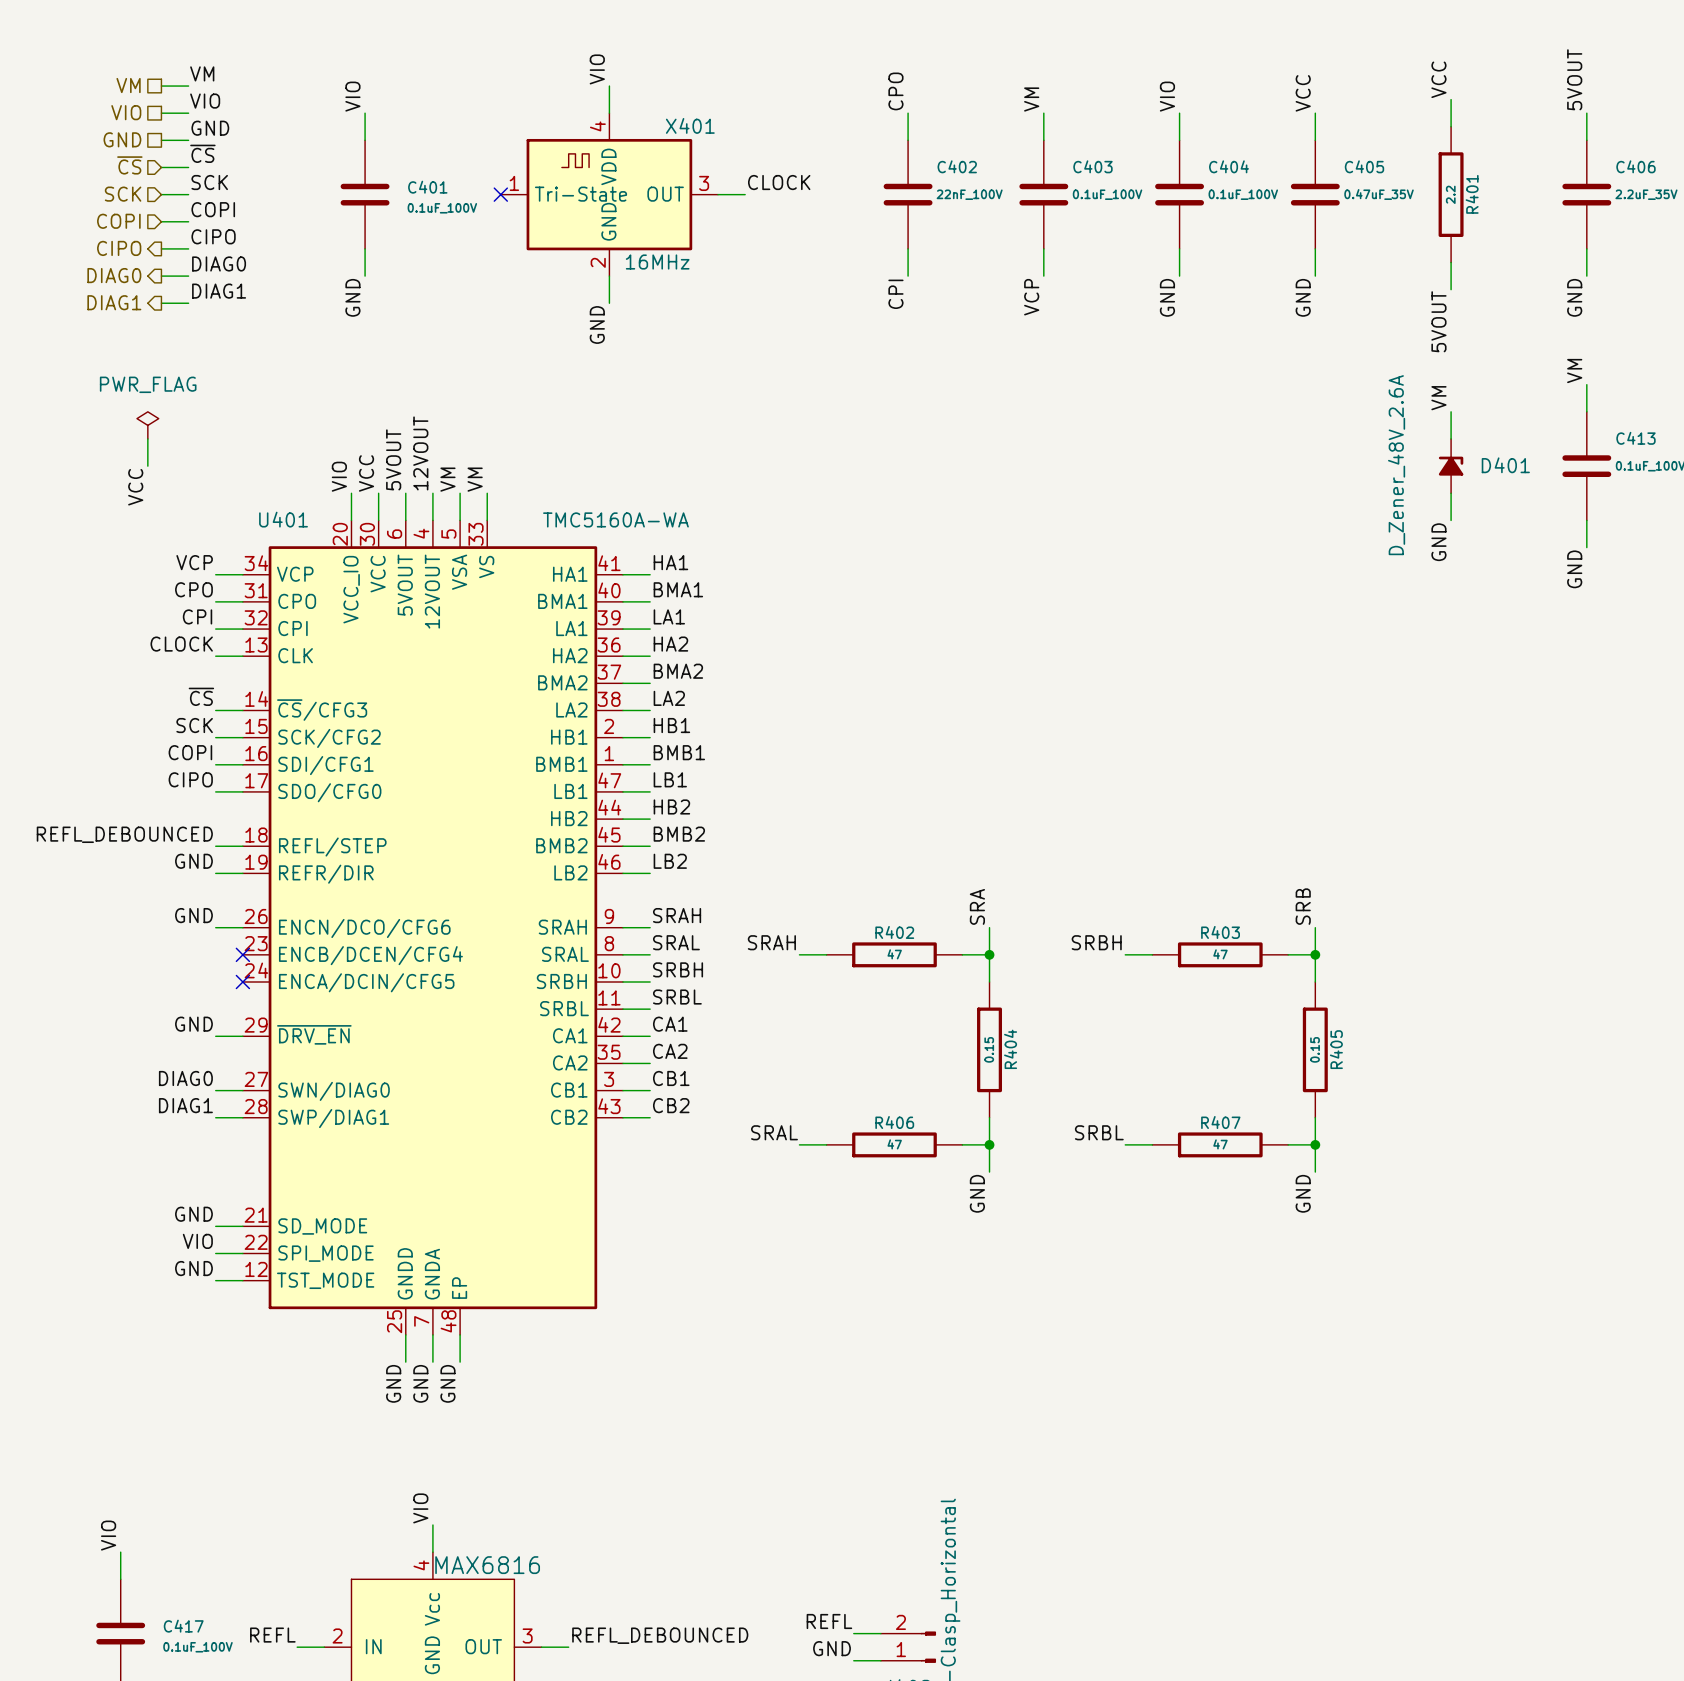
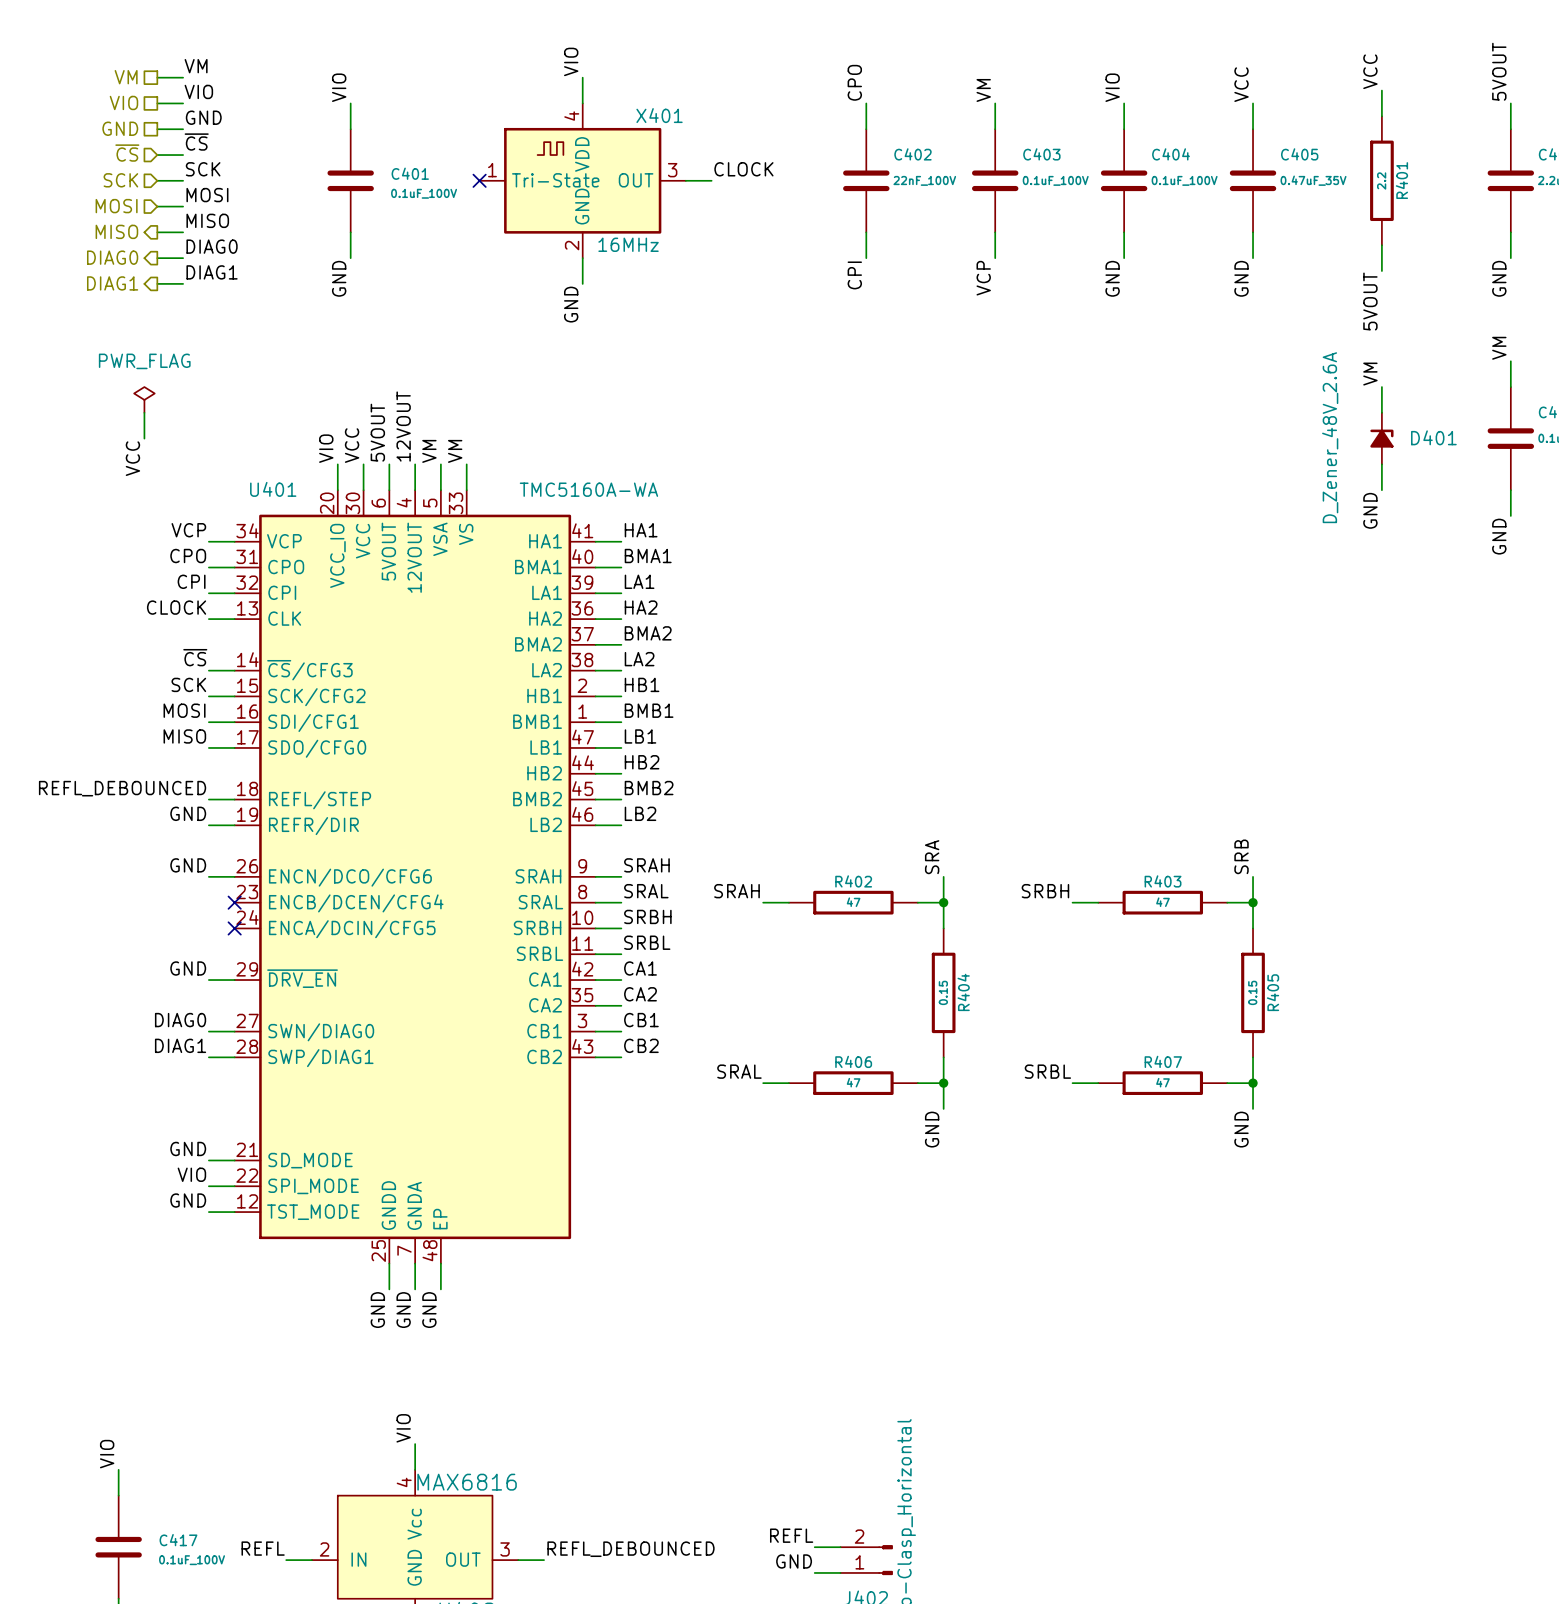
label: COPI (213, 209) -> MOSI (207, 195)
hierarchical label: COPI (118, 221) -> MOSI (116, 206)
label: CIPO (213, 236) -> MISO (207, 220)
hierarchical label: CIPO (119, 248) -> MISO (116, 231)
label: COPI (190, 752) -> MOSI (184, 710)
label: CIPO (190, 779) -> MISO (184, 736)

